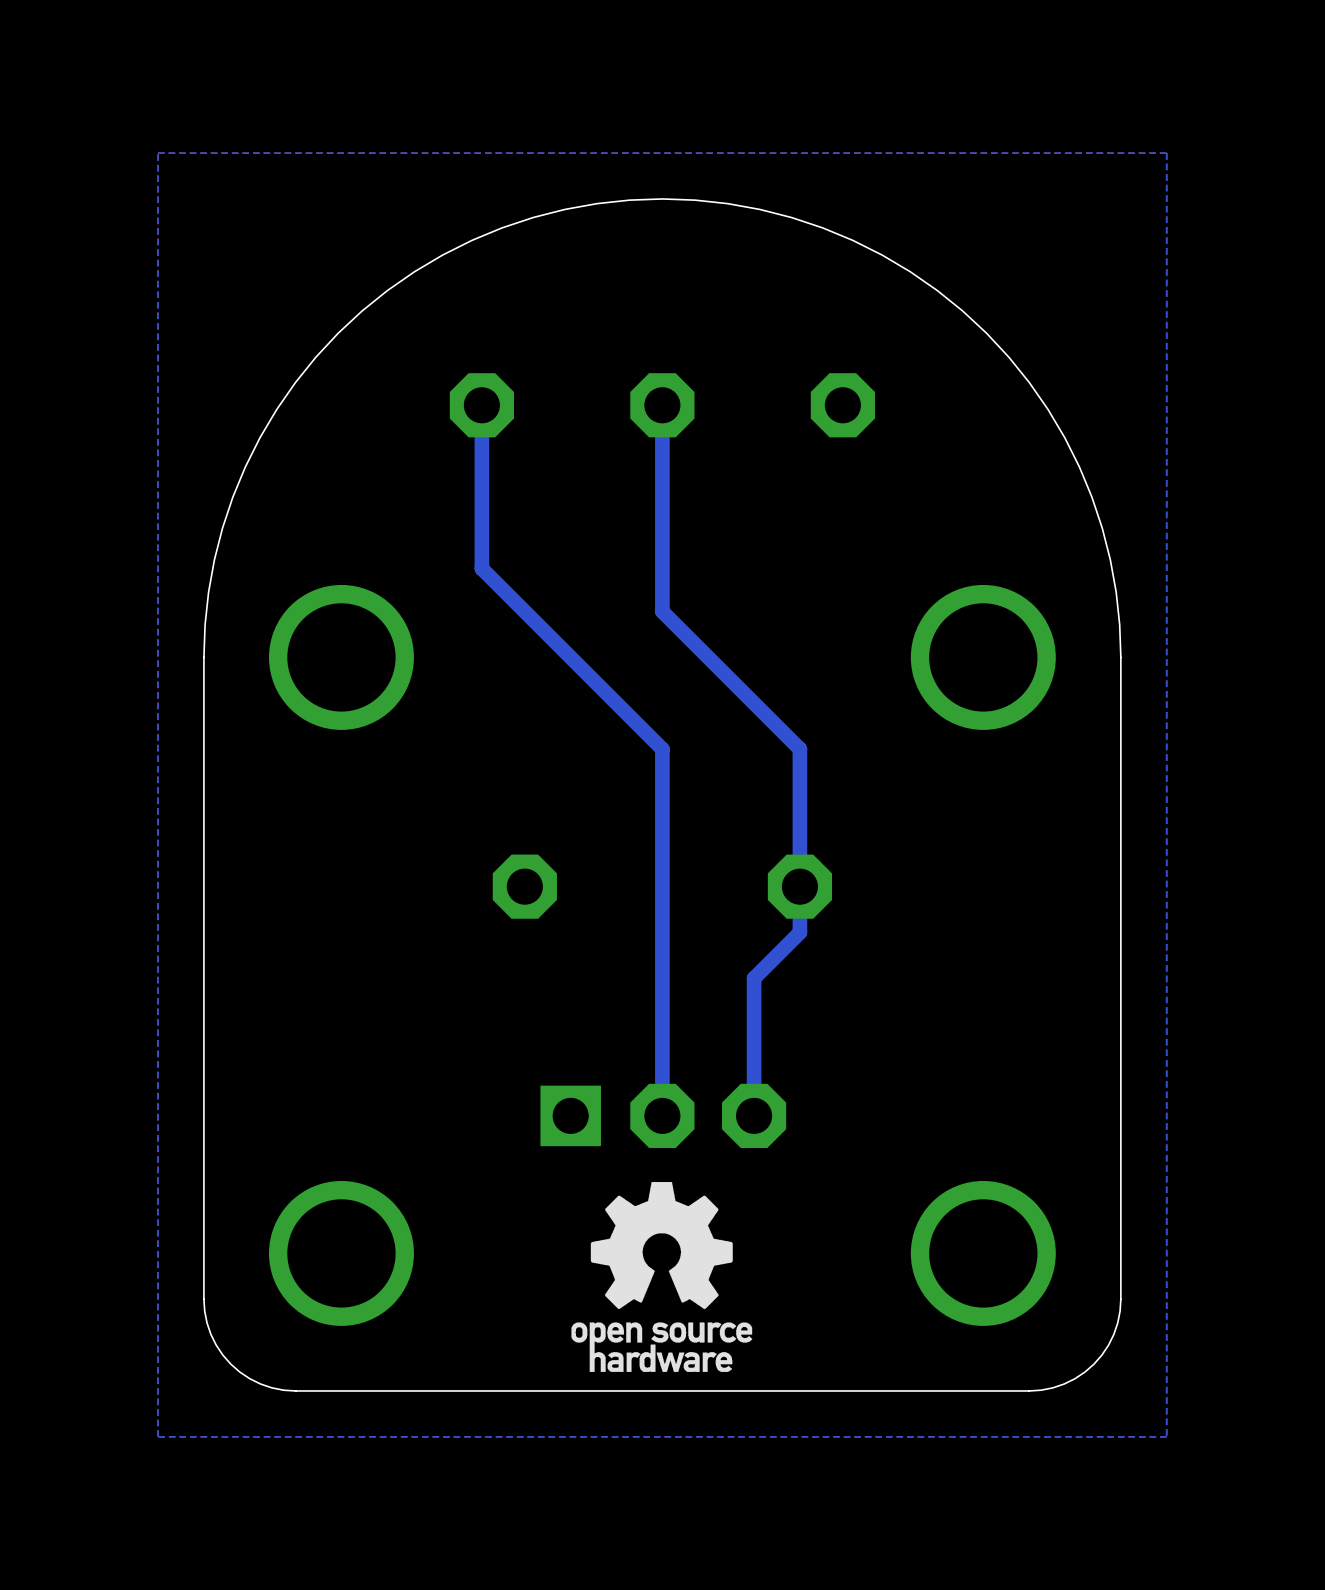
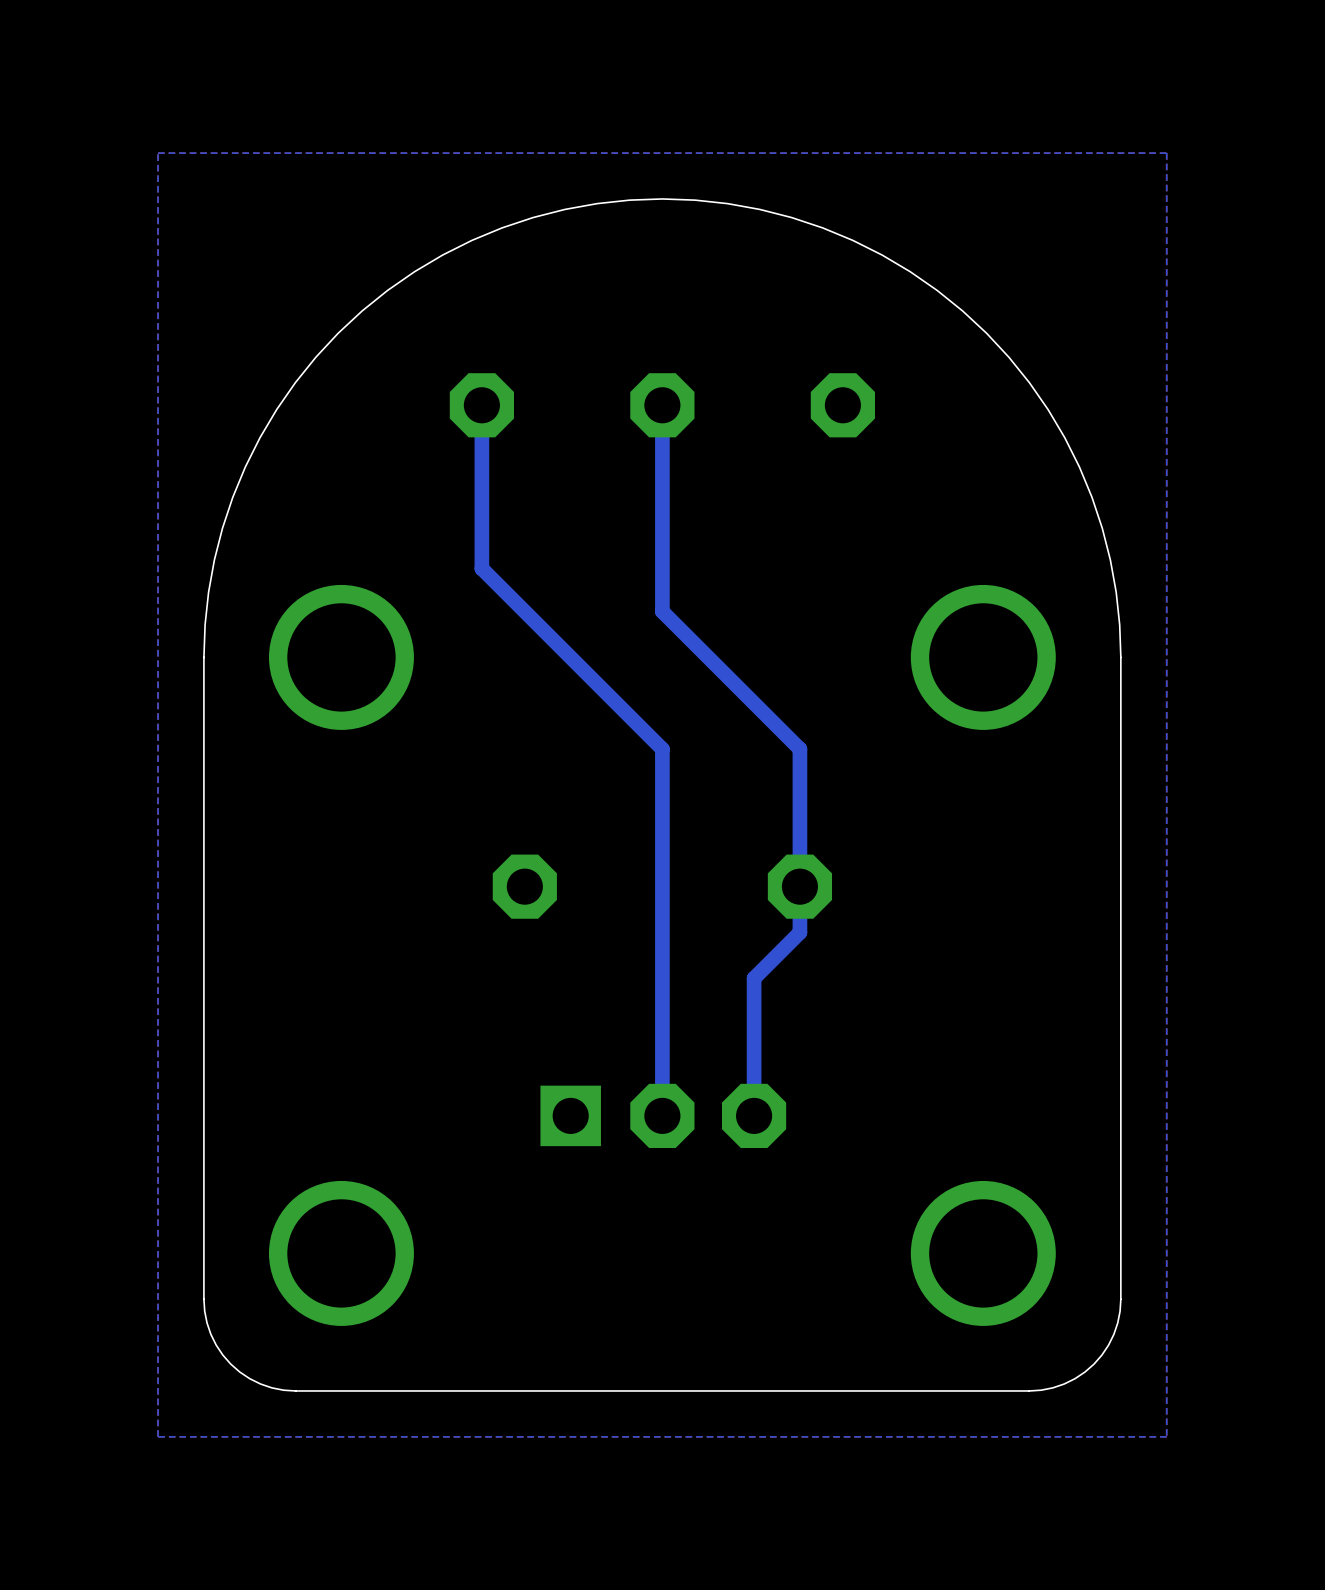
drawing: [571, 1182, 753, 1372] -> none

